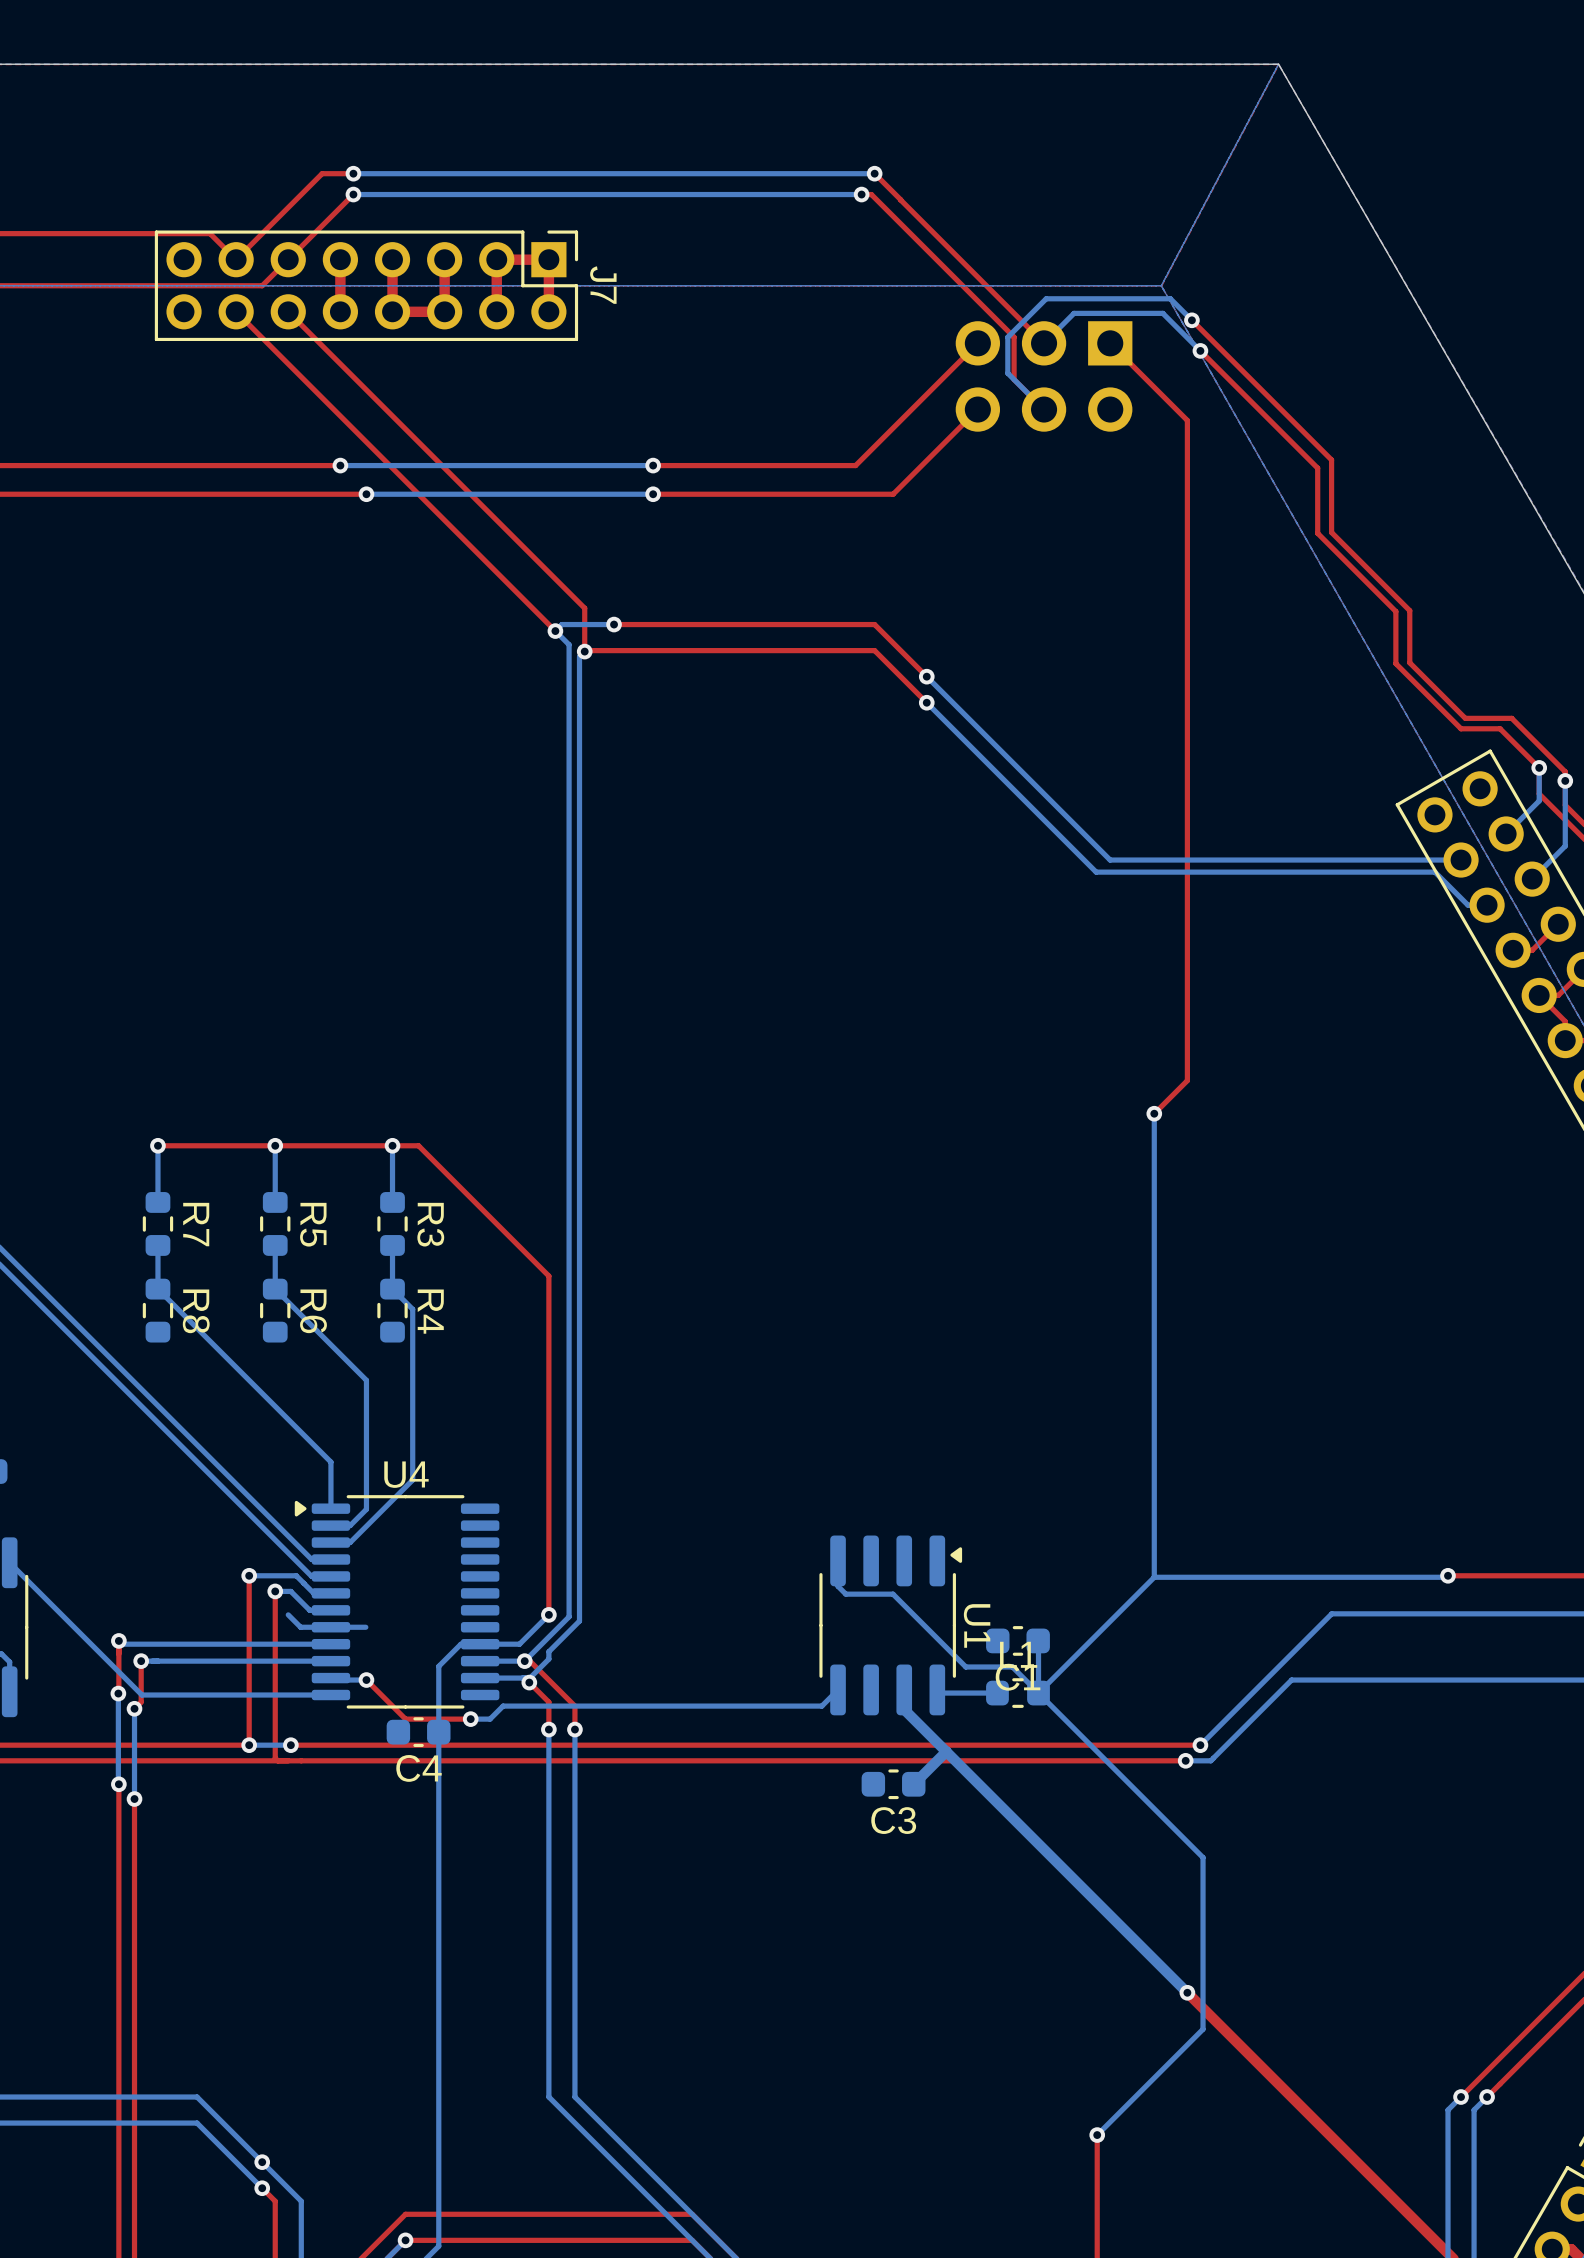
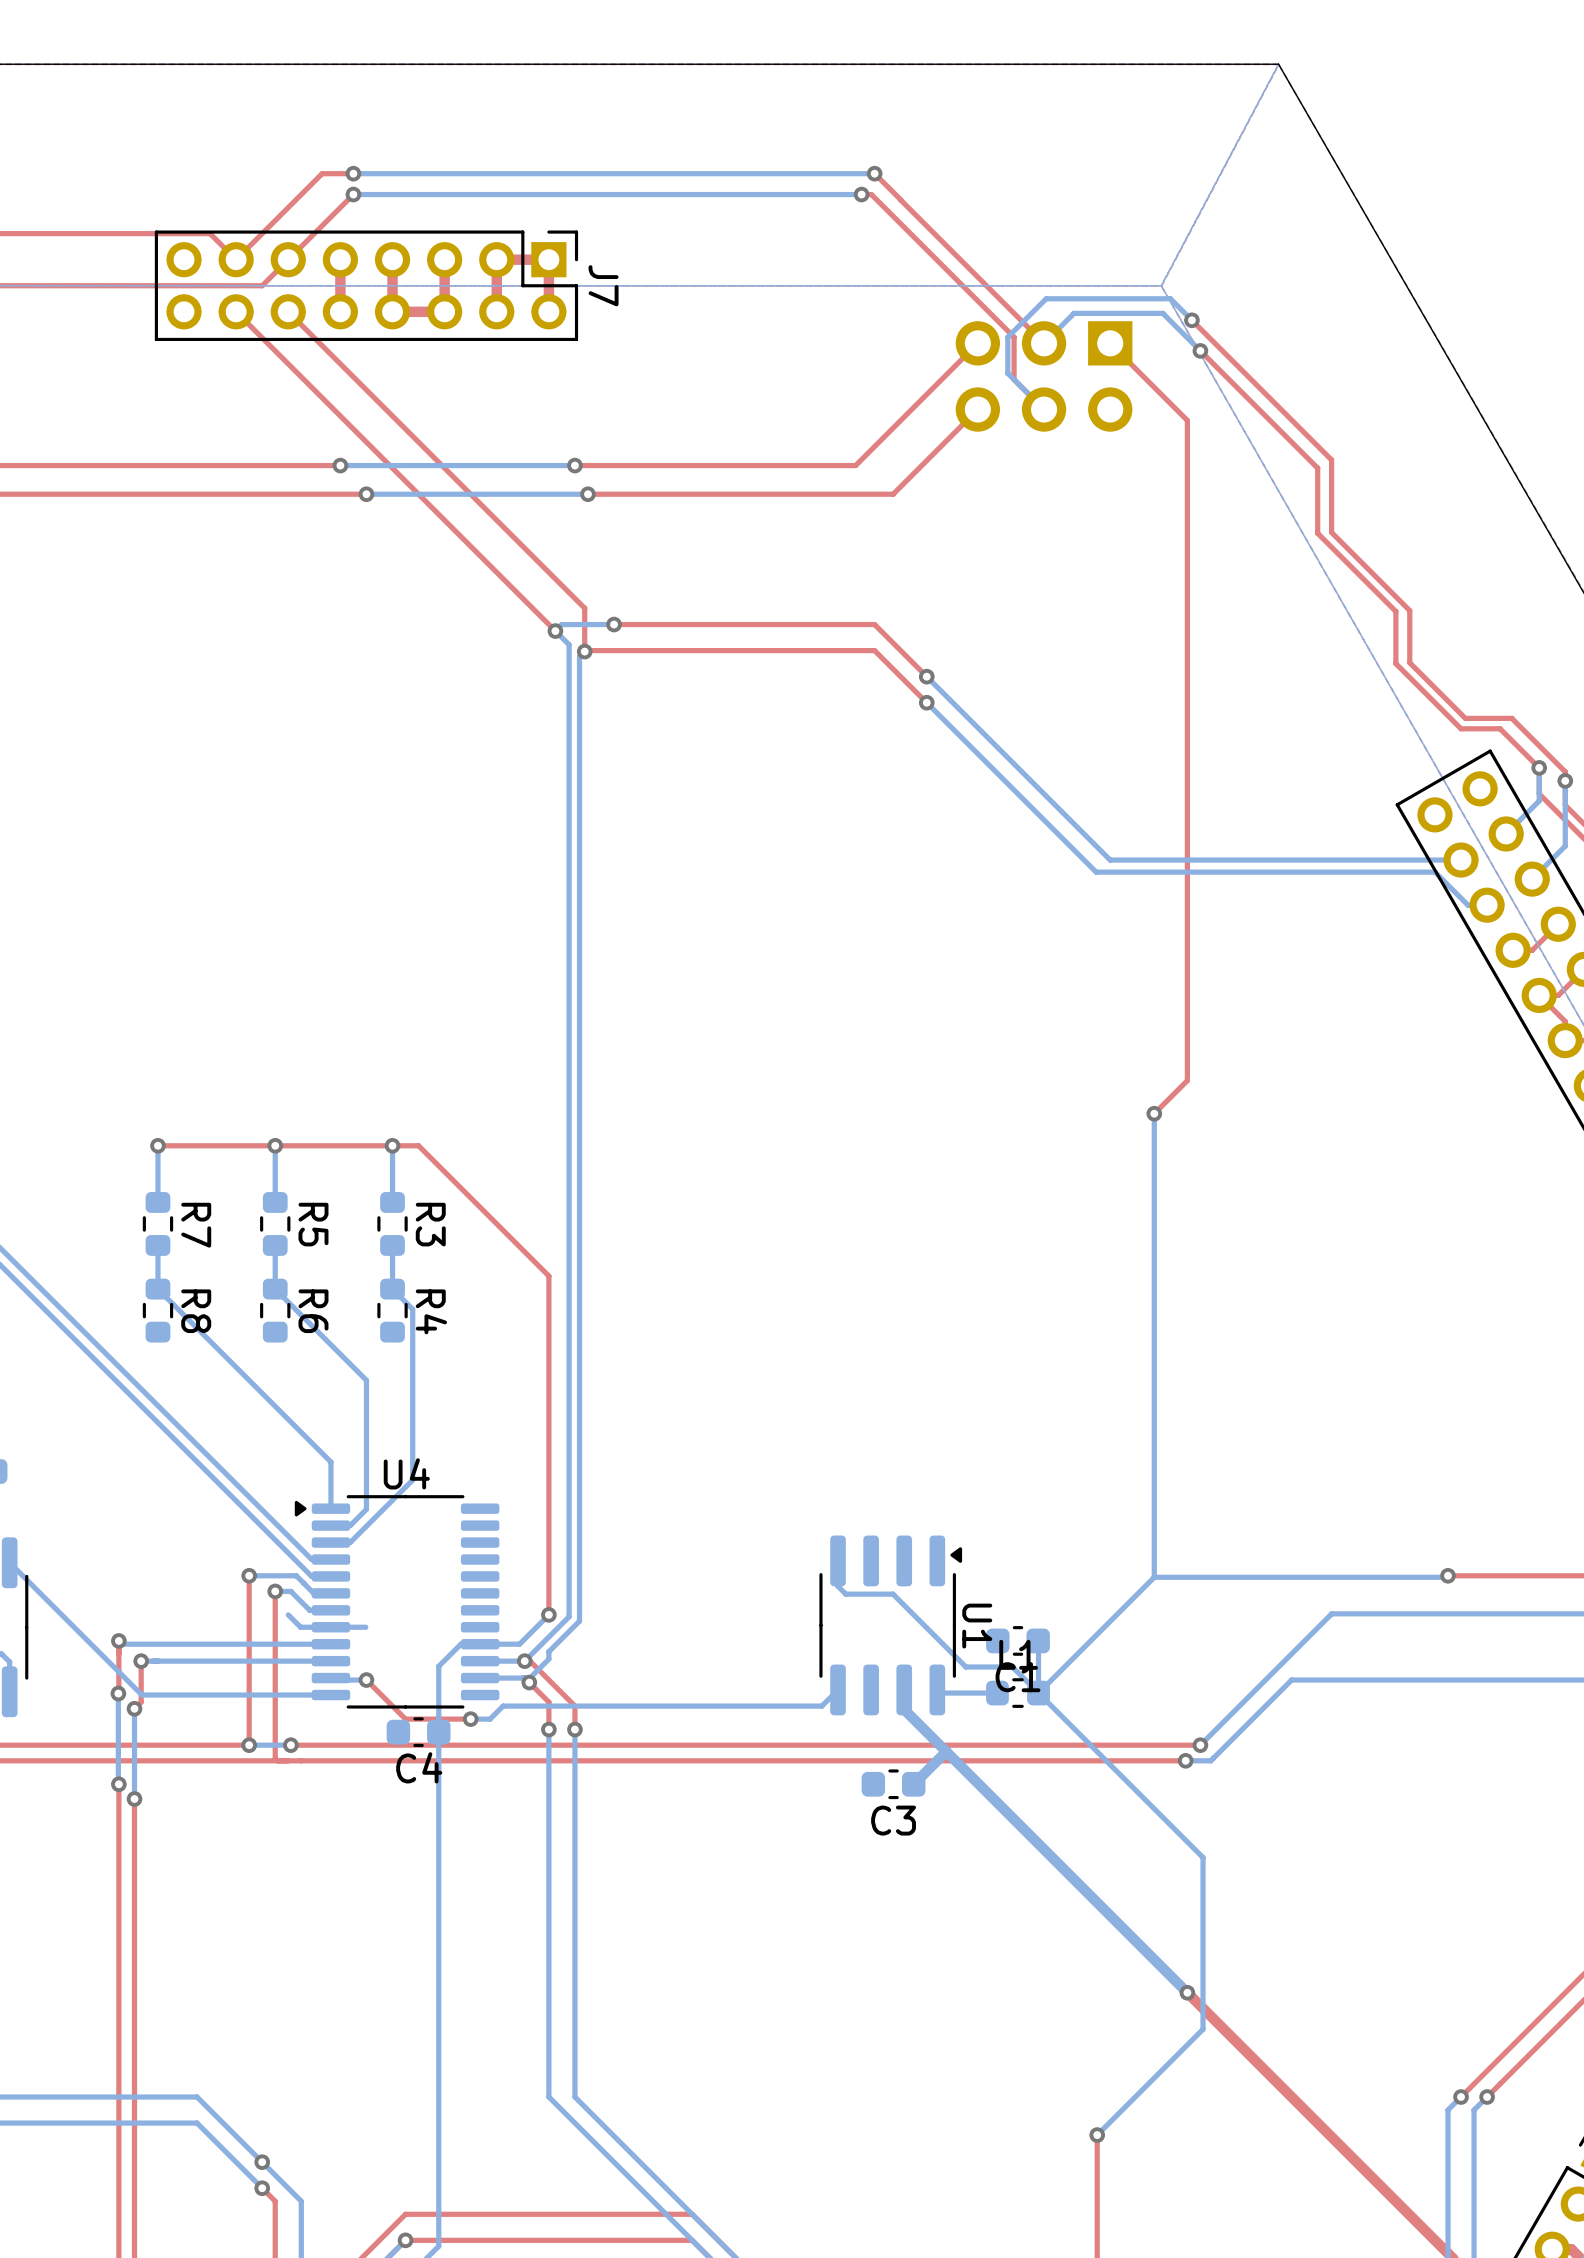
via: none -> (574, 465)
top track: none -> (653, 465) (574, 465)
bottom track: (653, 465) (574, 465) -> none
via: (653, 465) -> none
via: none -> (587, 494)
top track: none -> (653, 494) (587, 494)
bottom track: (653, 494) (587, 494) -> none
via: (653, 494) -> none

